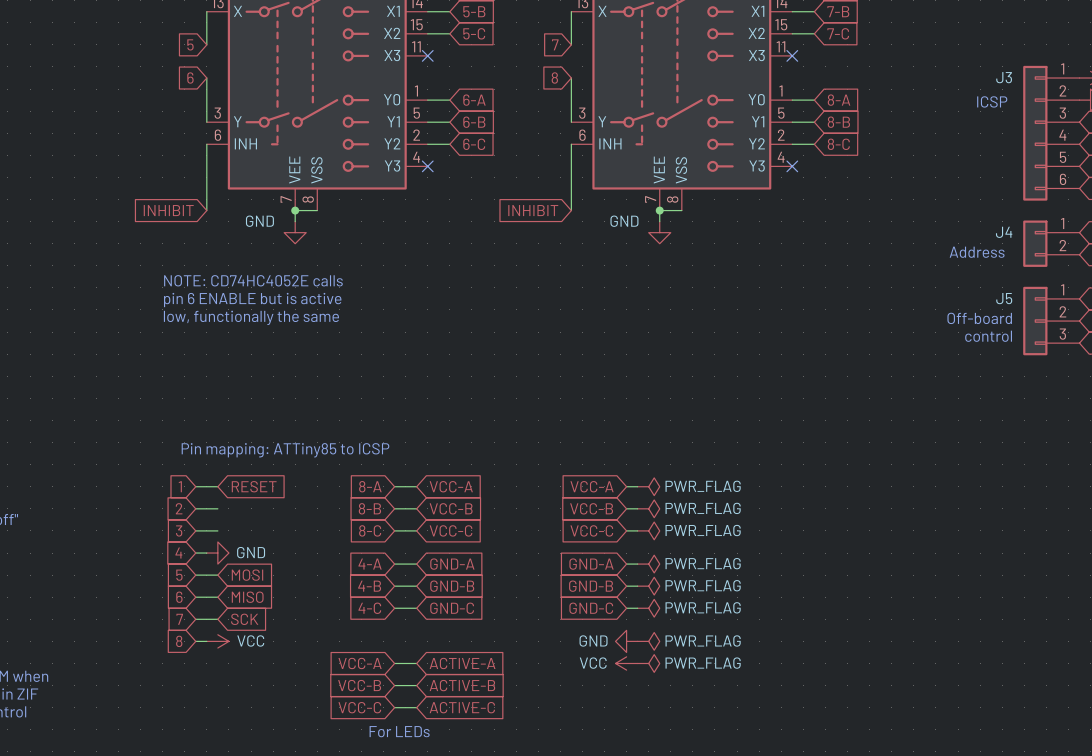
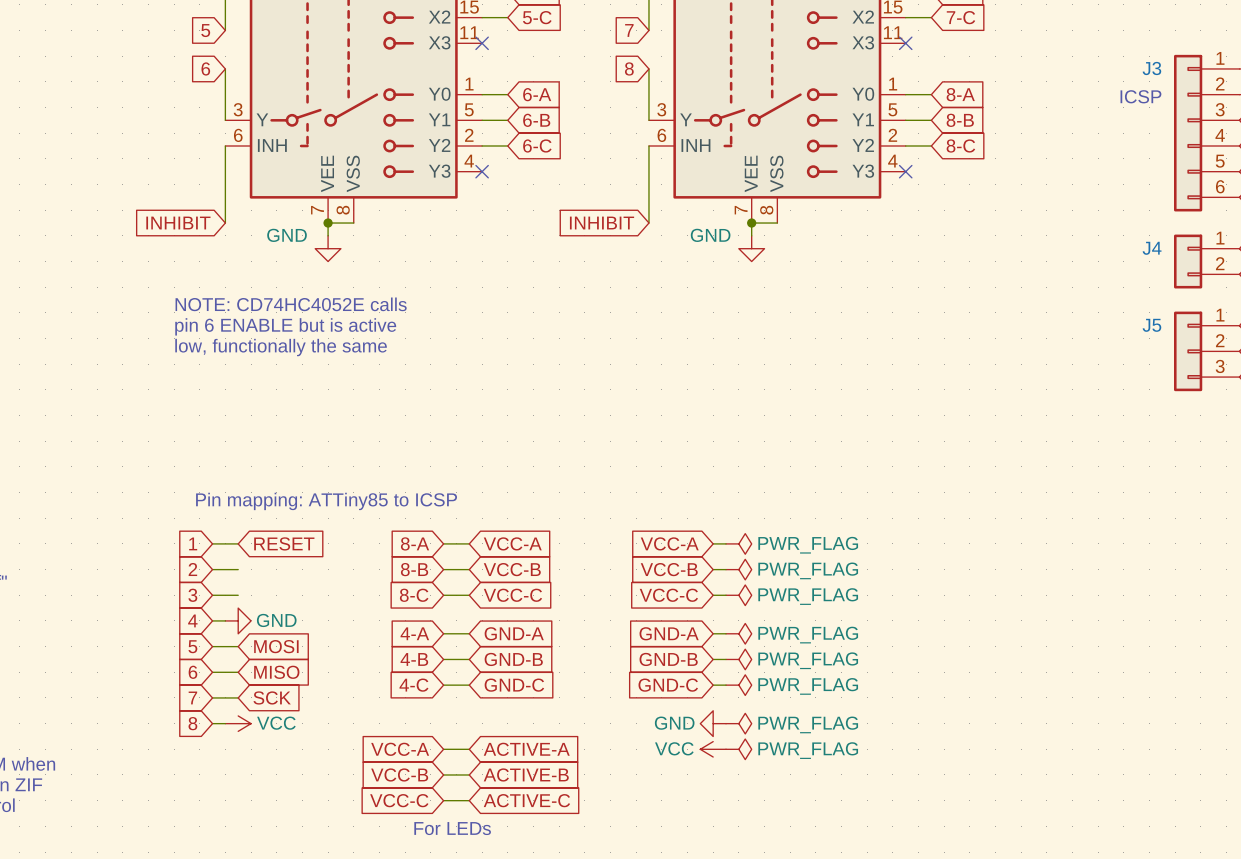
text: Address (977, 252) -> none
text: Off-board (979, 318) -> none
text: control (988, 336) -> none

